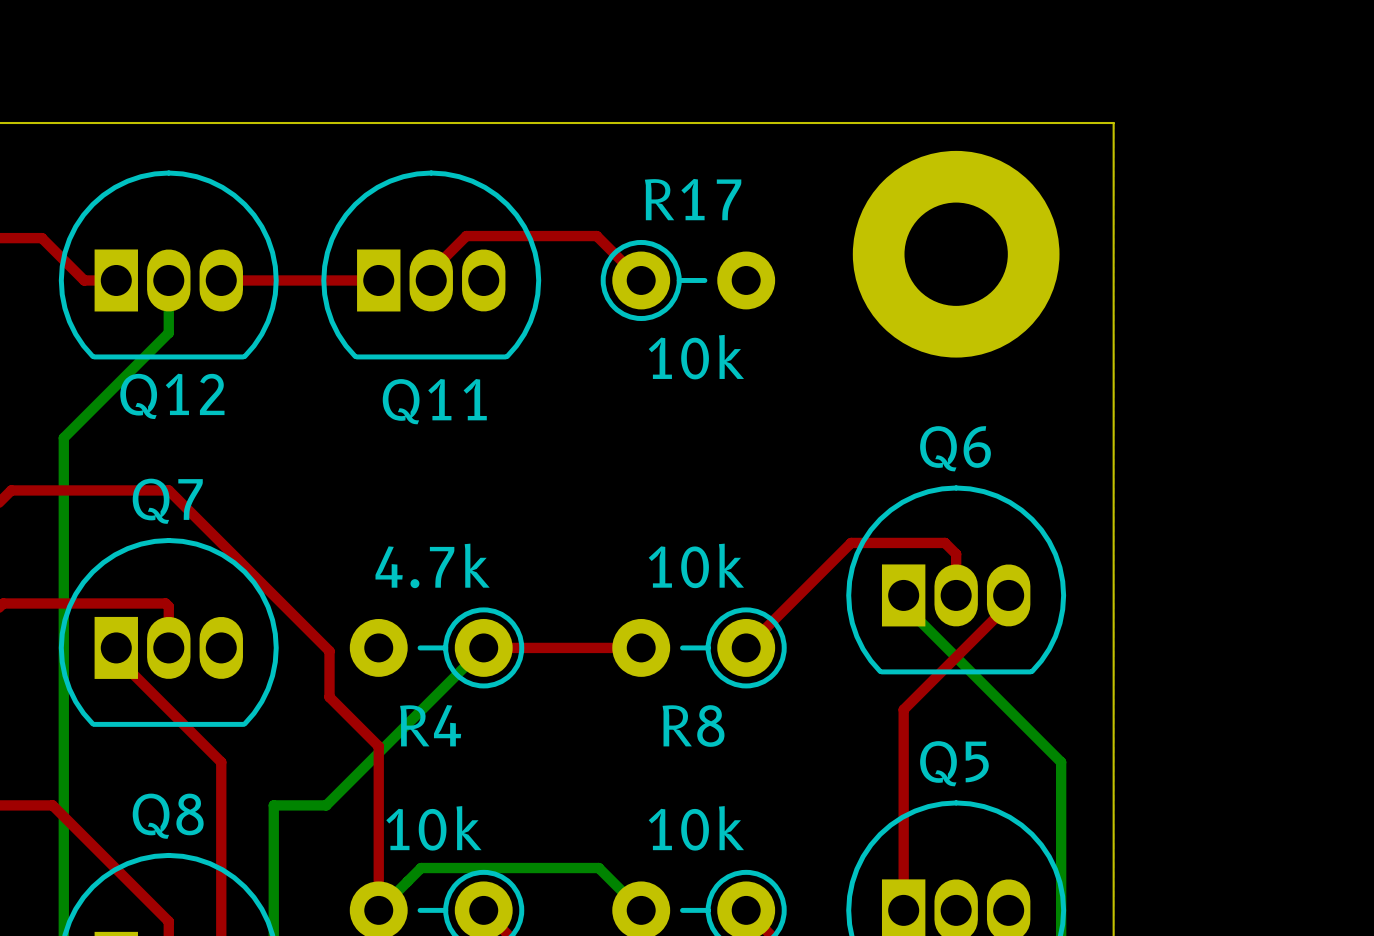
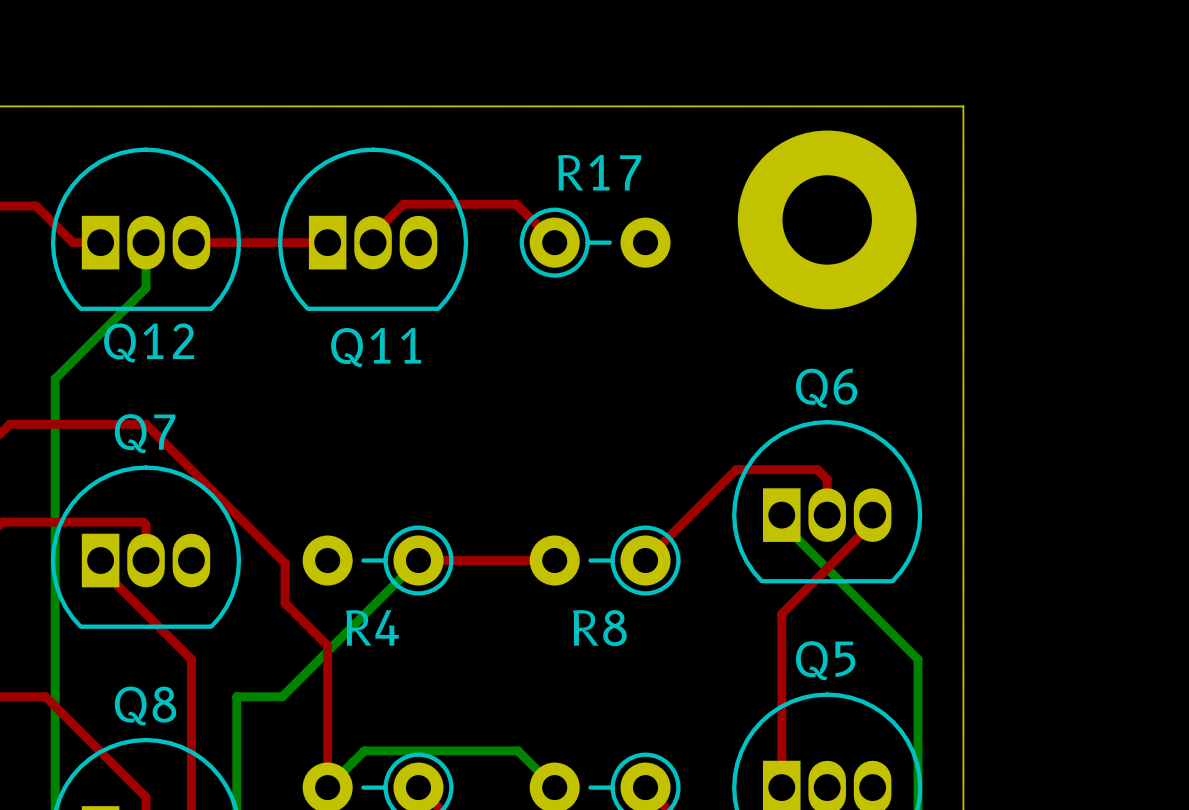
R17 value: 10k (696, 357) -> none
R4 value: 4.7k (432, 565) -> none
R8 value: 10k (696, 565) -> none
part value: 10k (433, 828) -> none
part value: 10k (696, 828) -> none

